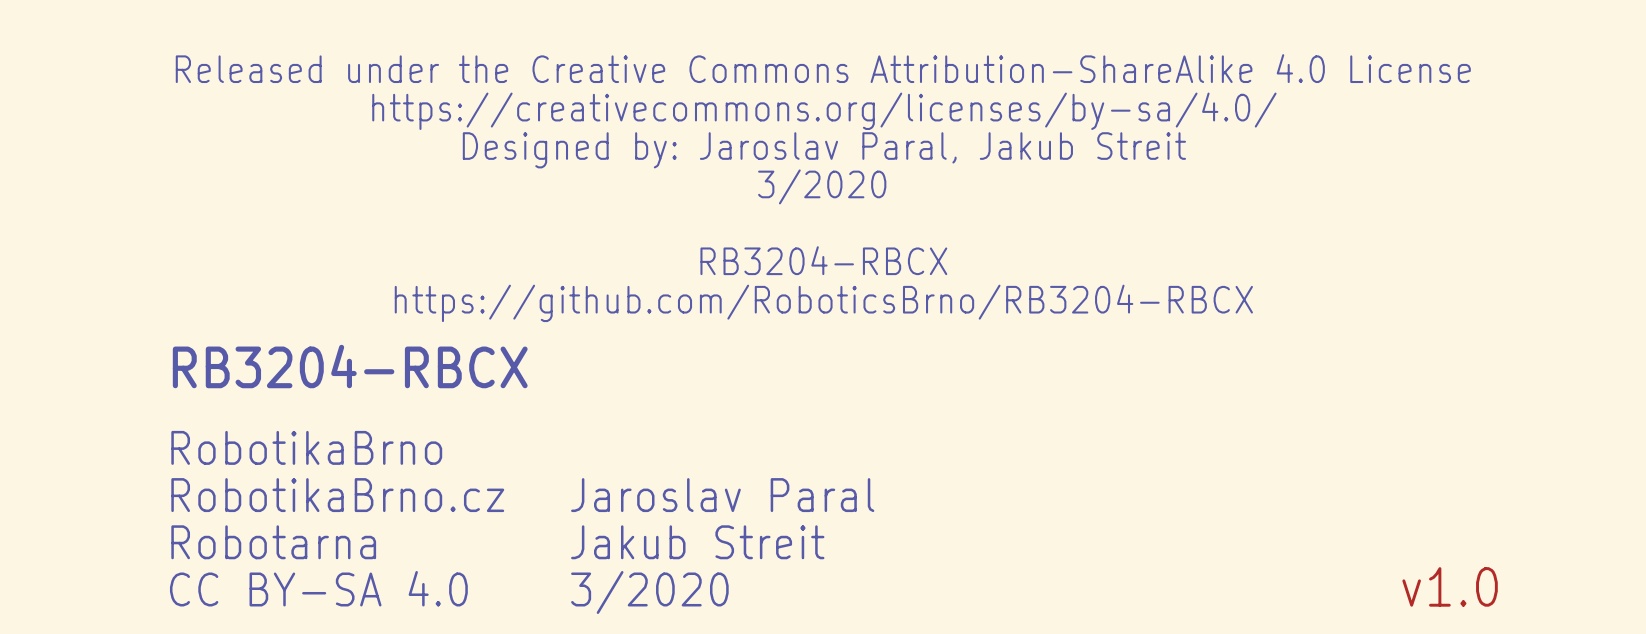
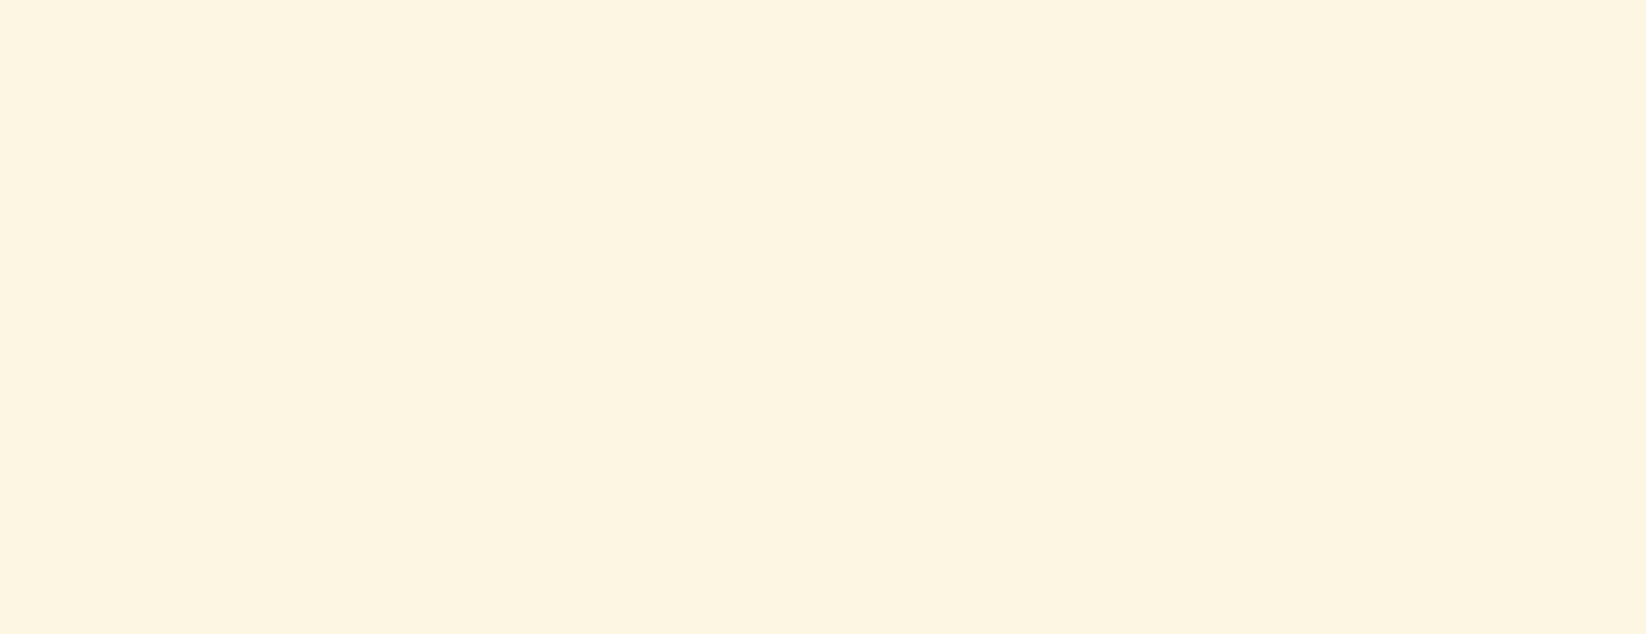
text: Released under the Creative Commons Attribution-ShareAlike 4.0 License (823, 68) -> none
text: https://creativecommons.org/licenses/by-sa/4.0/ (824, 111) -> none
text: Designed by: Jaroslav Paral, Jakub Streit (824, 150) -> none
text: 3/2020 (822, 186) -> none
text: RB3204-RBCX (823, 260) -> none
text: https://github.com/RoboticsBrno/RB3204-RBCX (823, 303) -> none
text: RB3204-RBCX (350, 366) -> none
text: RobotikaBrno (306, 447) -> none
text: RobotikaBrno.cz (337, 495) -> none
text: Jaroslav Paral (722, 495) -> none
text: Robotarna (273, 542) -> none
text: Jakub Streit (697, 542) -> none
text: v1.0 (1450, 586) -> none
text: CC BY-SA 4.0 (318, 588) -> none
text: 3/2020 (649, 592) -> none

